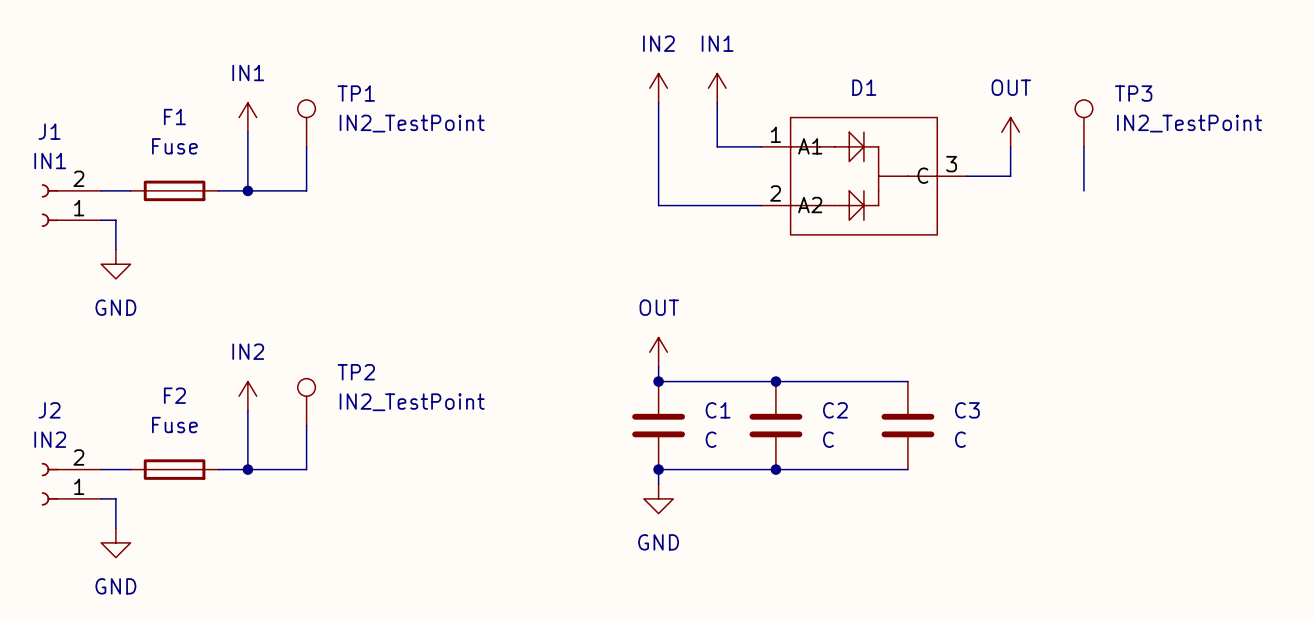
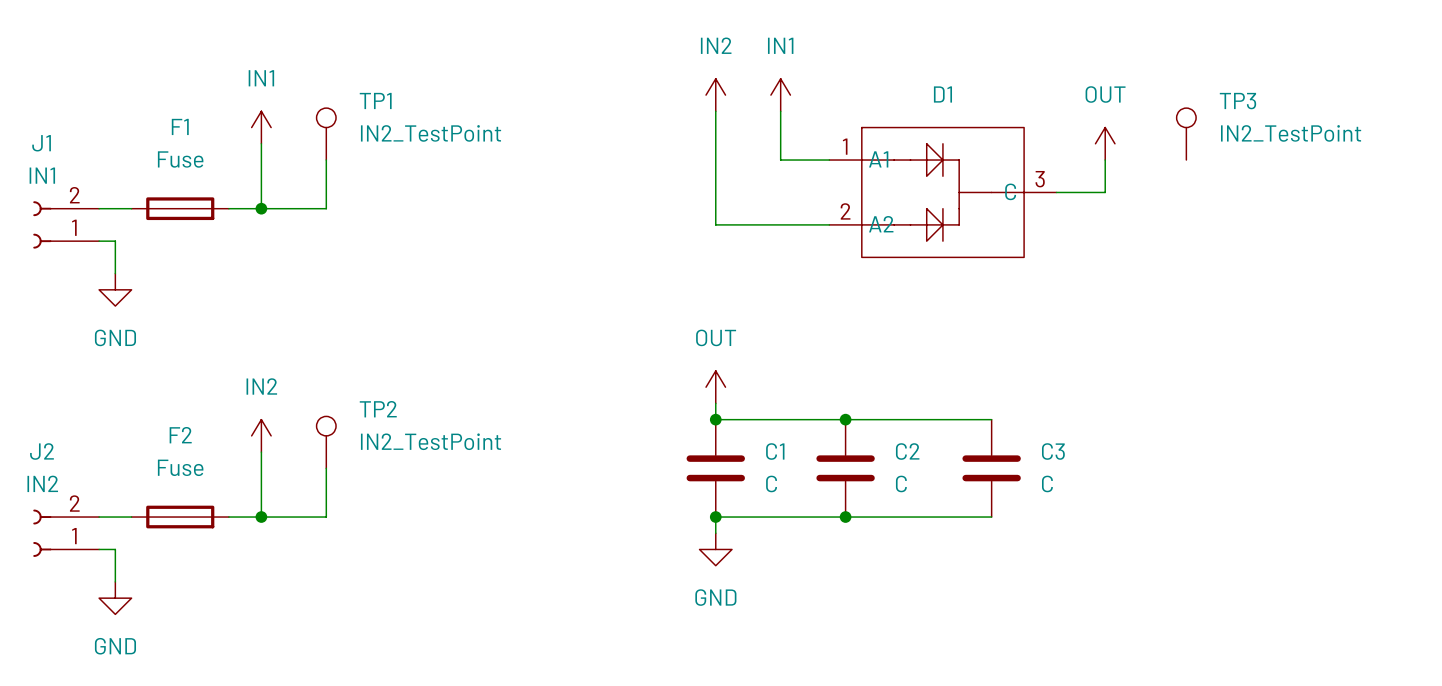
wire: (1083, 146) (1083, 190) -> none

